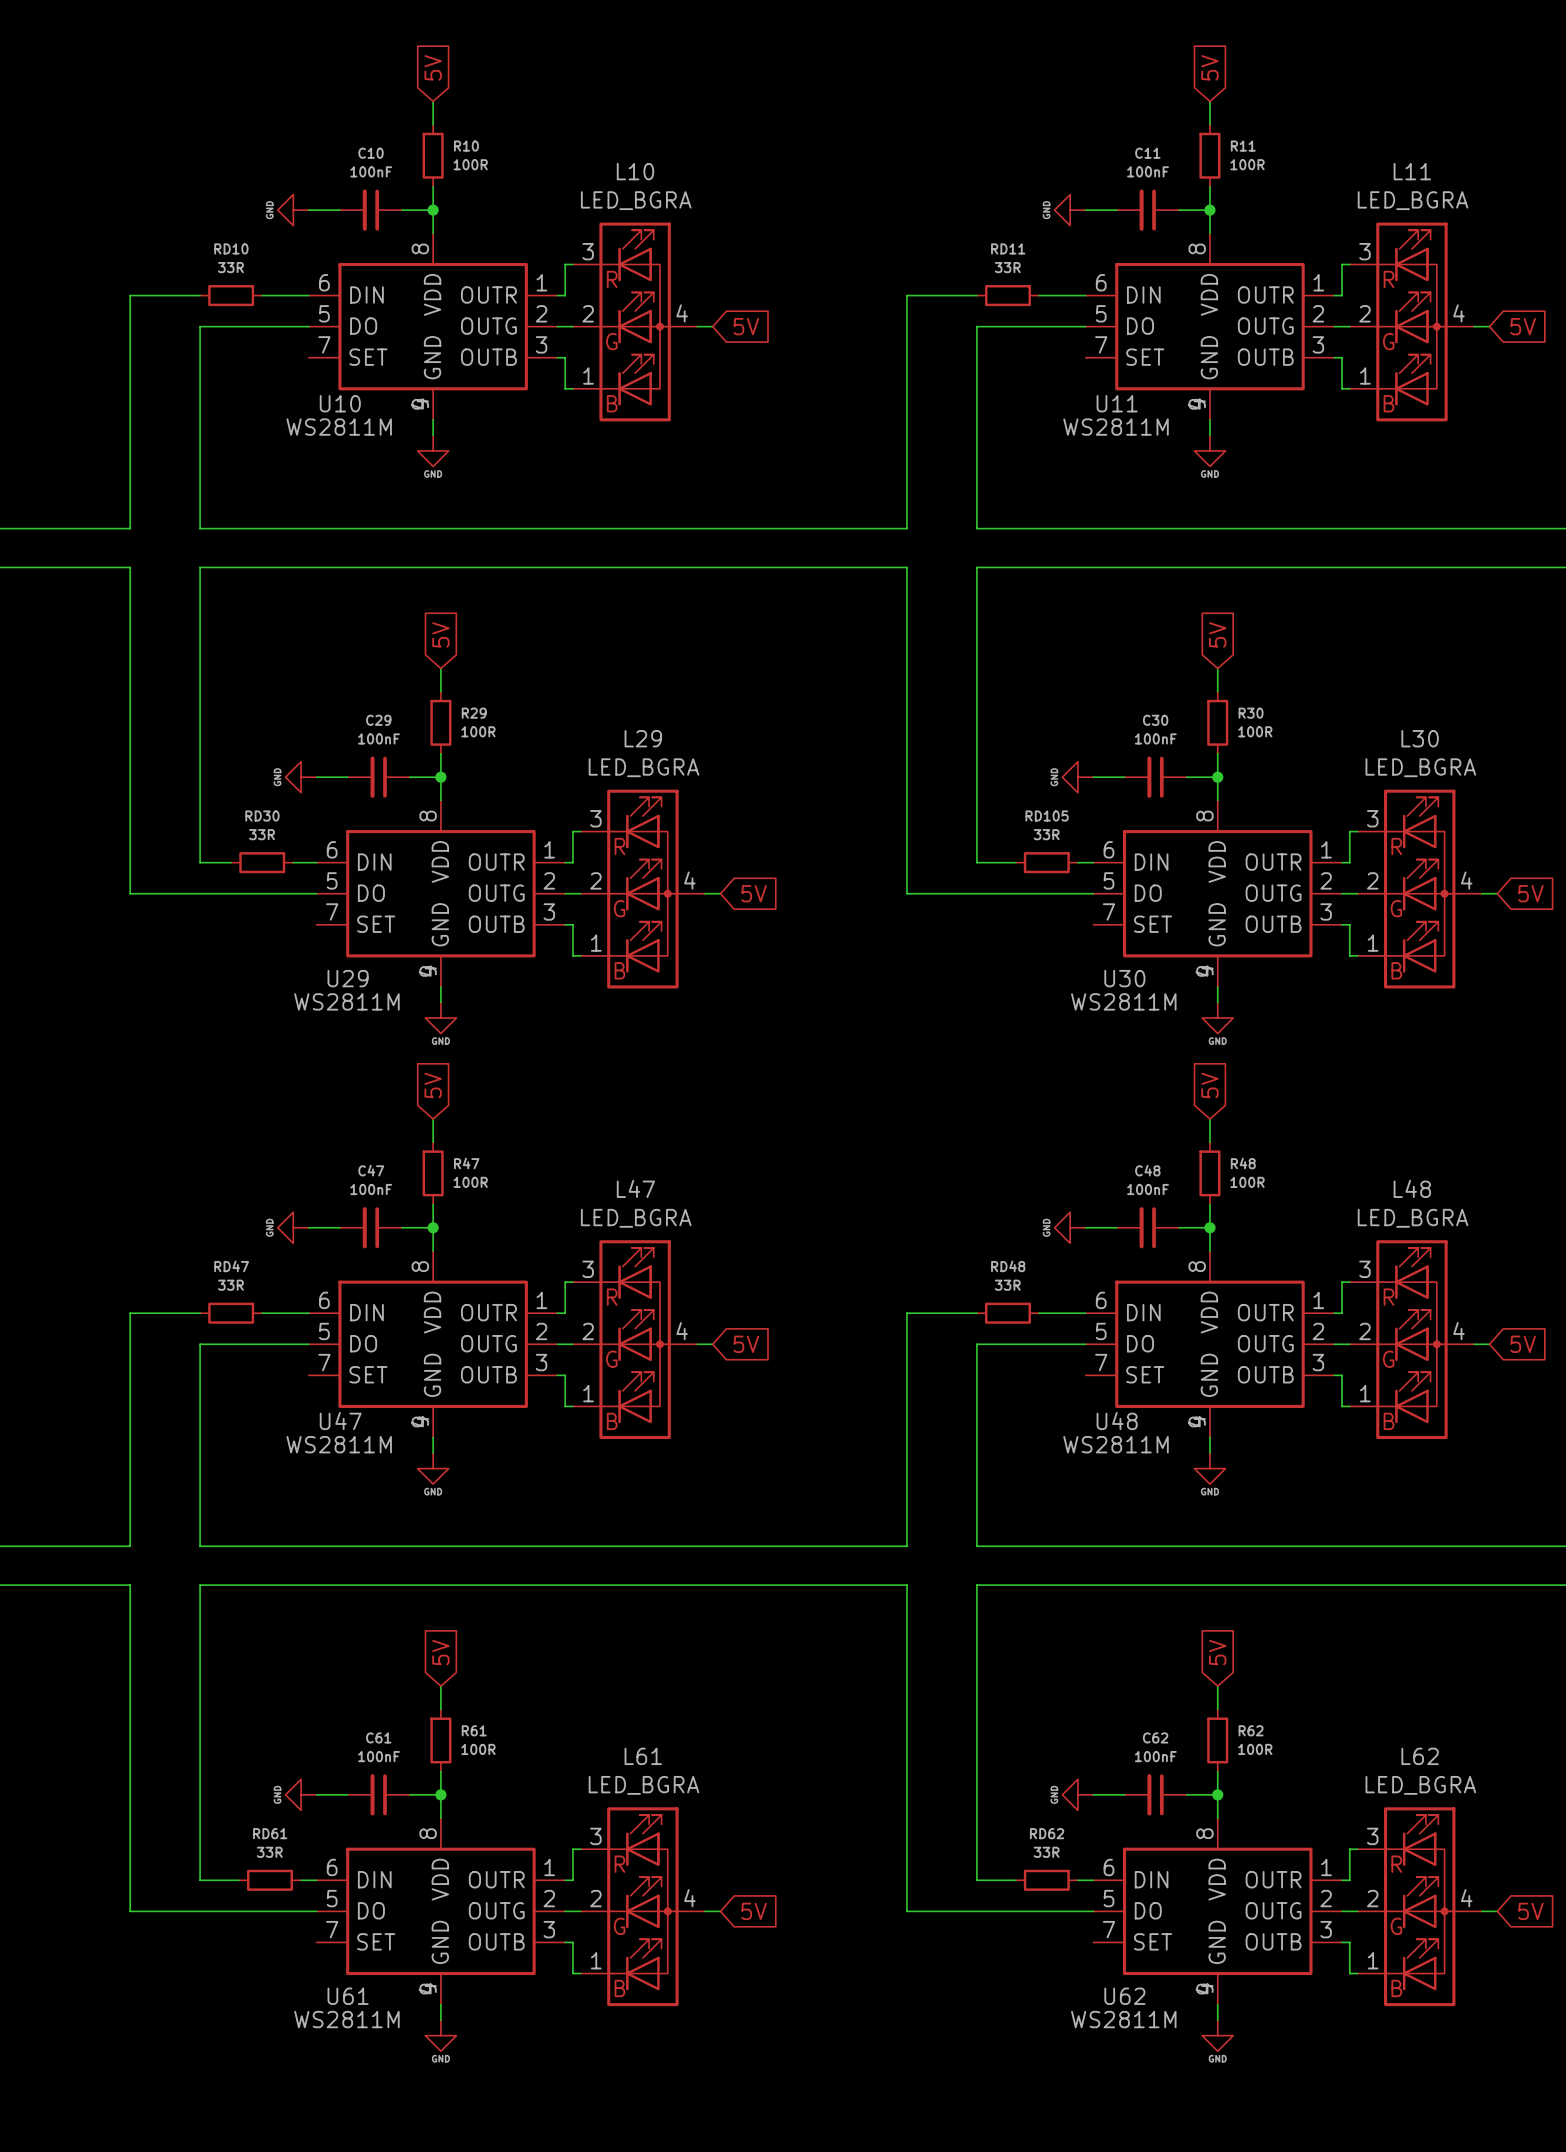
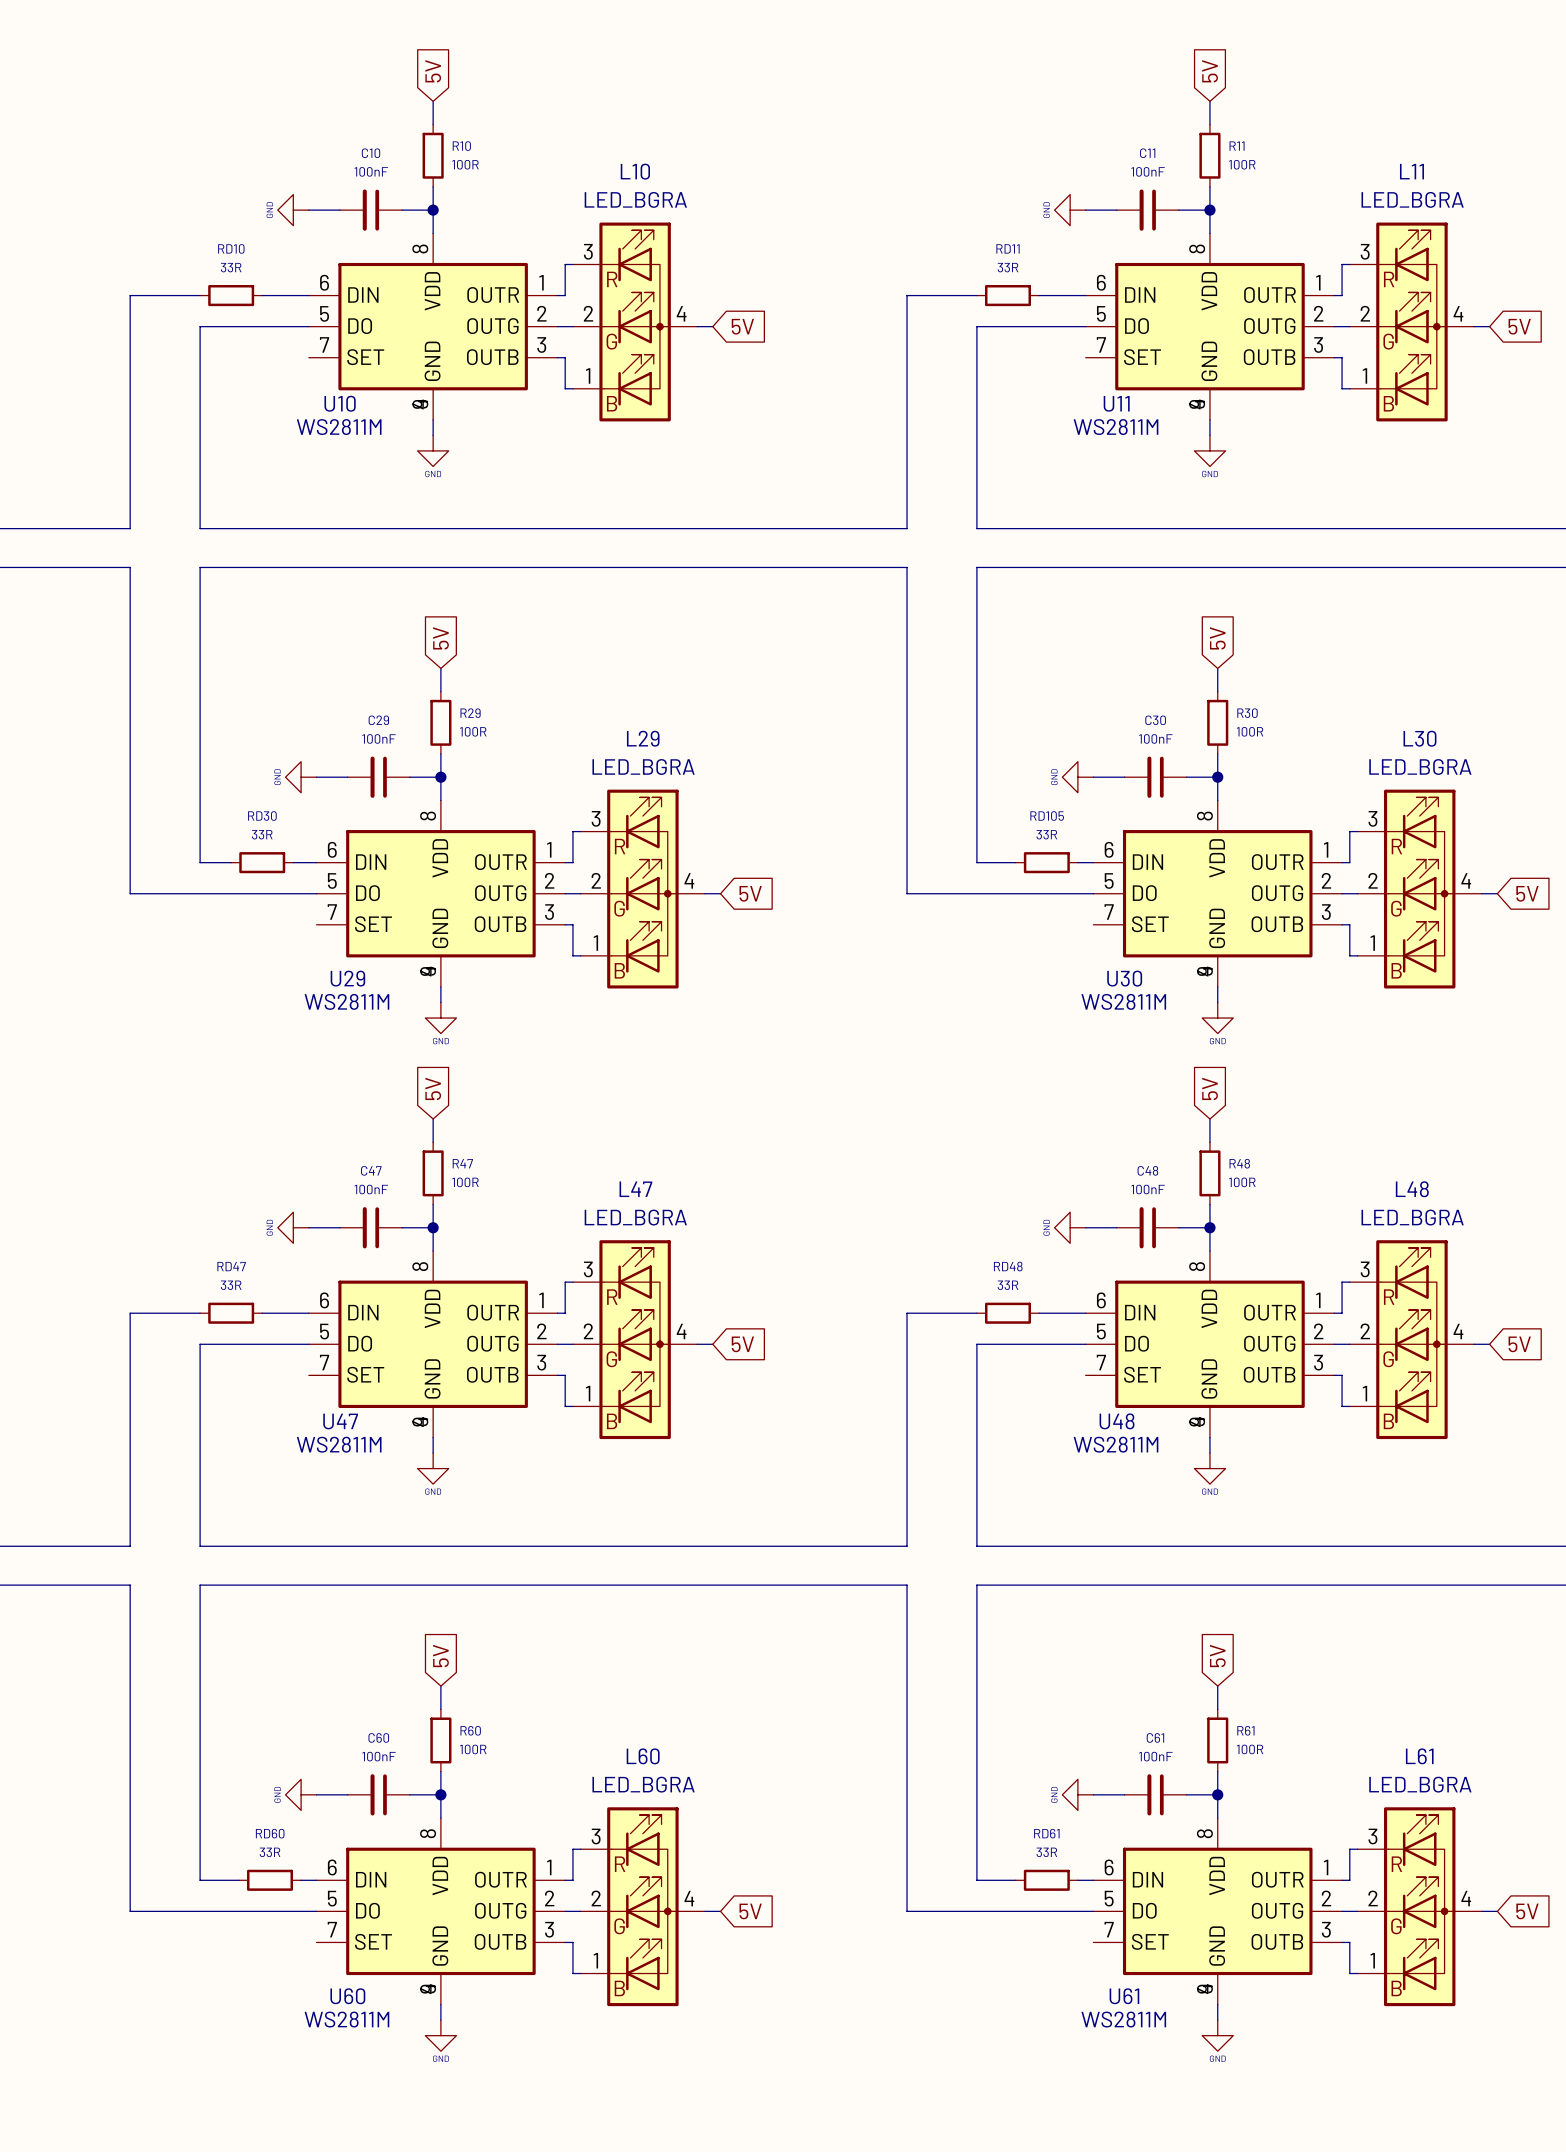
R61 name: R61 (474, 1730) -> R60 (470, 1730)
R62 name: R62 (1251, 1730) -> R61 (1245, 1730)
C61 name: C61 (378, 1737) -> C60 (378, 1737)
C62 name: C62 (1155, 1737) -> C61 (1155, 1737)
L61 name: L61 (643, 1756) -> L60 (643, 1756)
L62 name: L62 (1420, 1756) -> L61 (1419, 1756)
RD61 name: RD61 (270, 1833) -> RD60 (270, 1833)
RD62 name: RD62 (1047, 1833) -> RD61 (1046, 1833)
U61 name: U61 (348, 1996) -> U60 (347, 1996)
U62 name: U62 (1124, 1996) -> U61 (1124, 1996)

